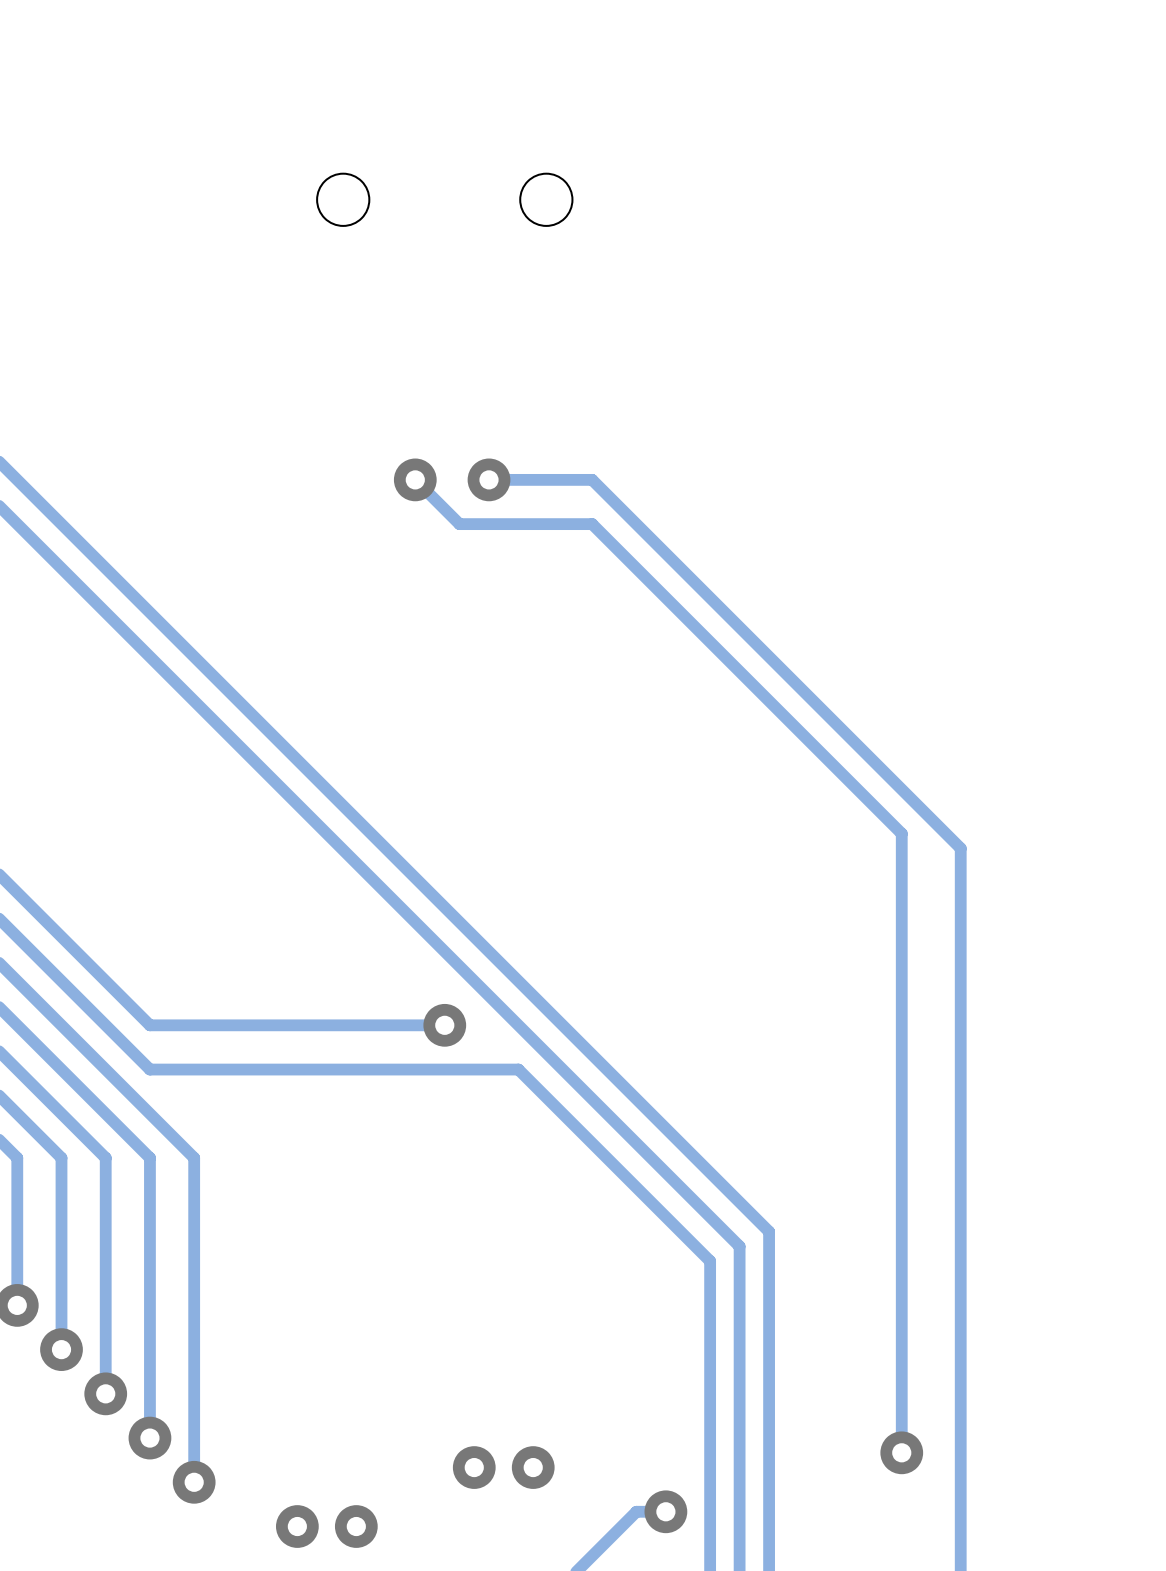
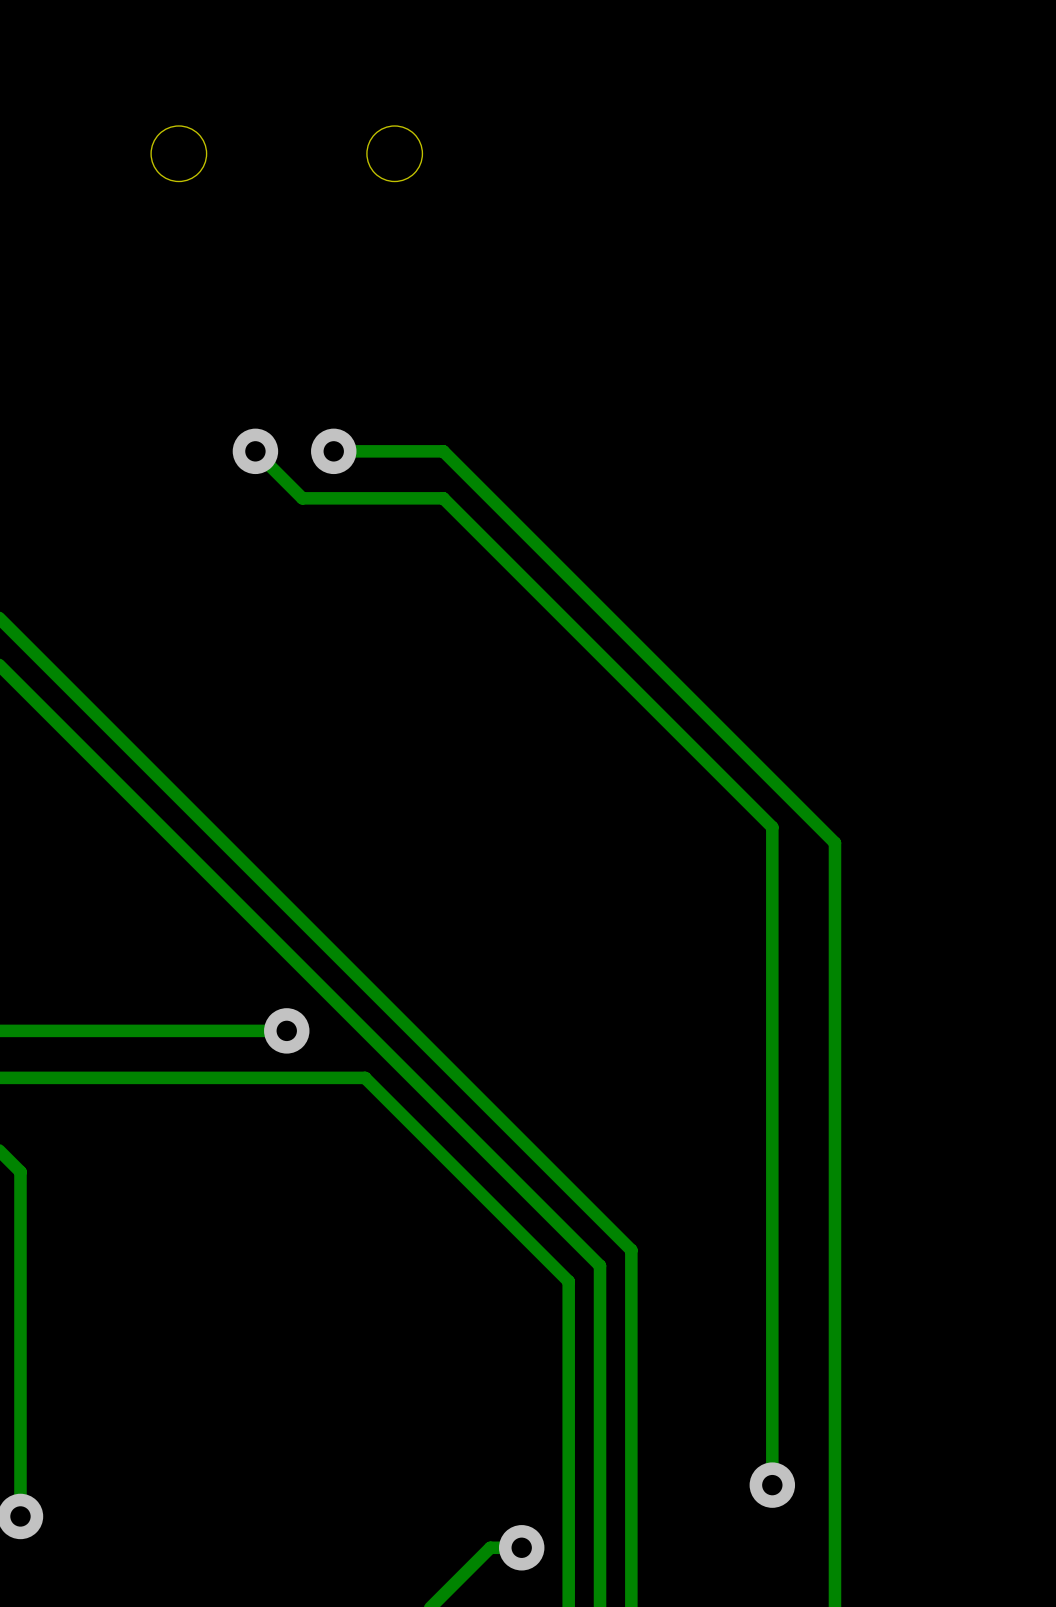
via: (474, 1467) -> none
via: (533, 1467) -> none
via: (297, 1526) -> none
via: (356, 1526) -> none

